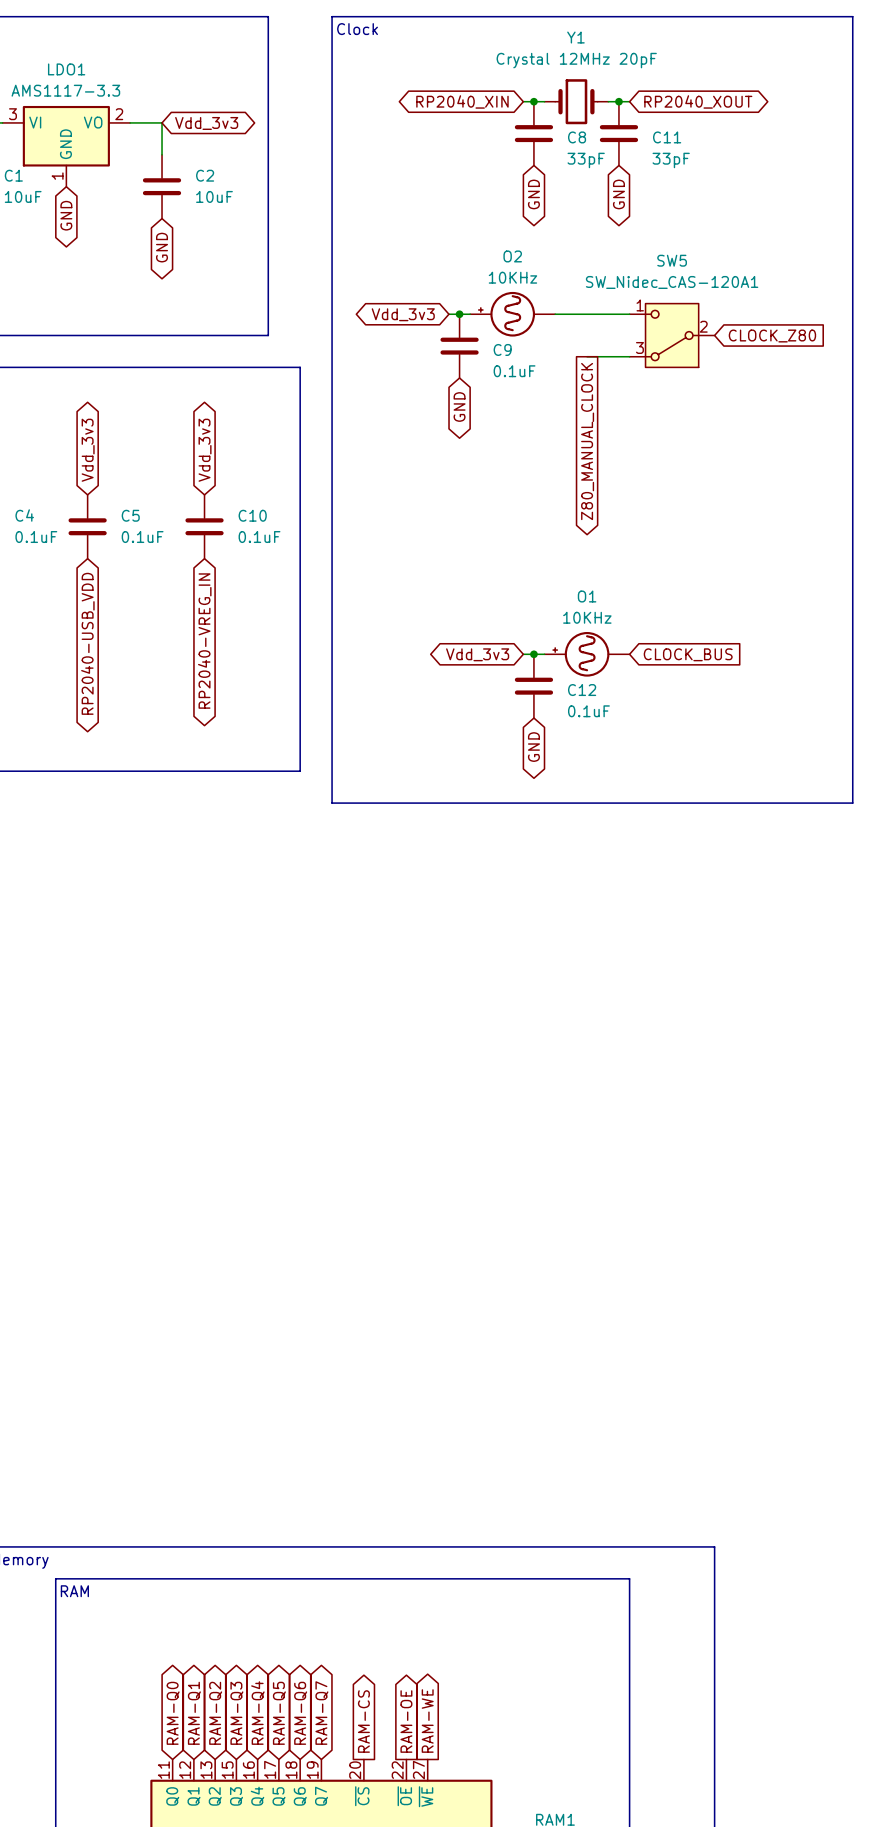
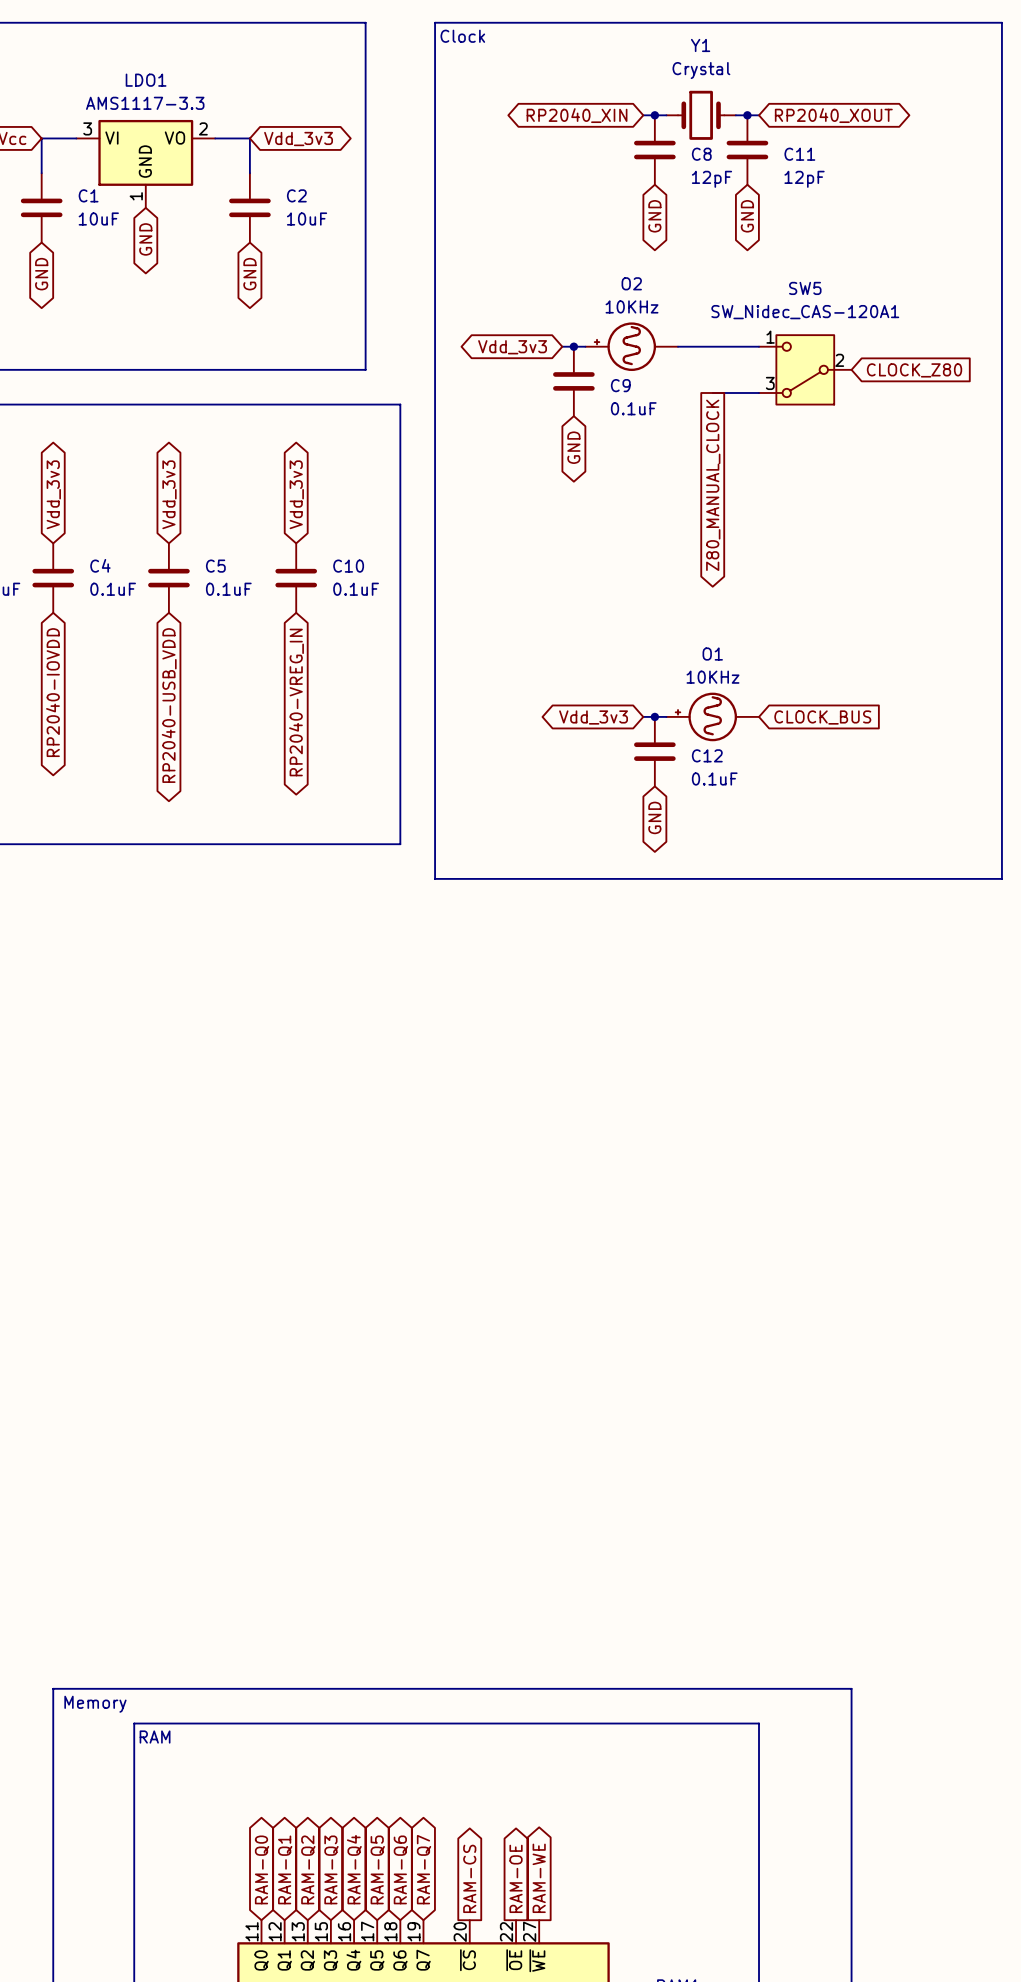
Y1 value: Crystal 12MHz 20pF (576, 60) -> Crystal (701, 70)
C8 value: 33pF (586, 160) -> 12pF (711, 179)
C11 value: 33pF (671, 160) -> 12pF (804, 179)

